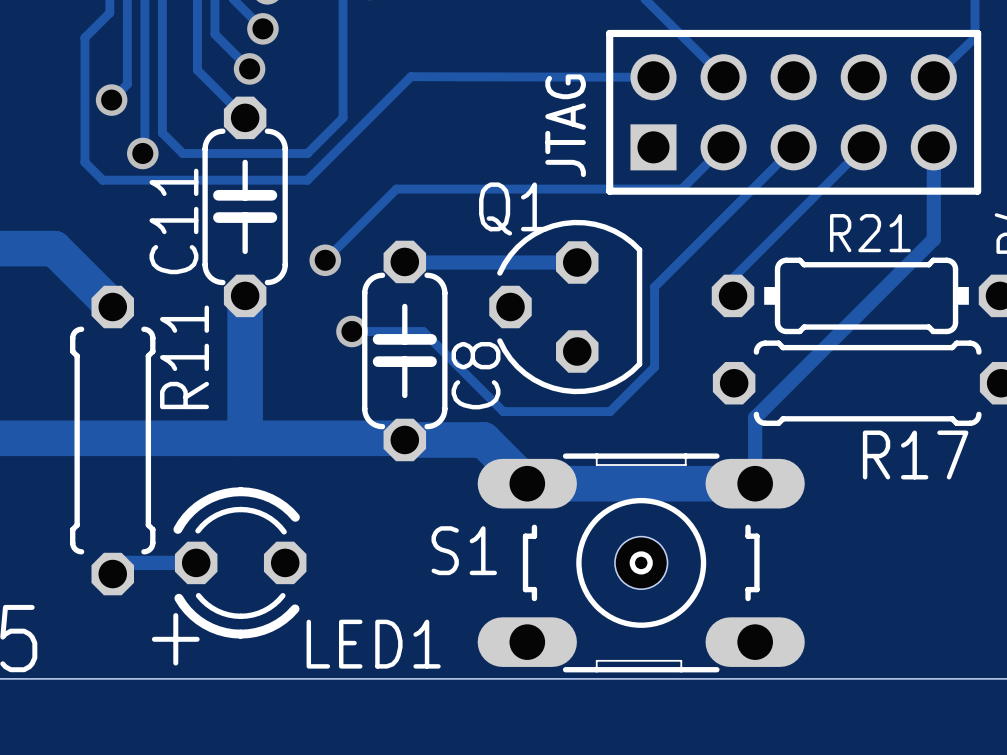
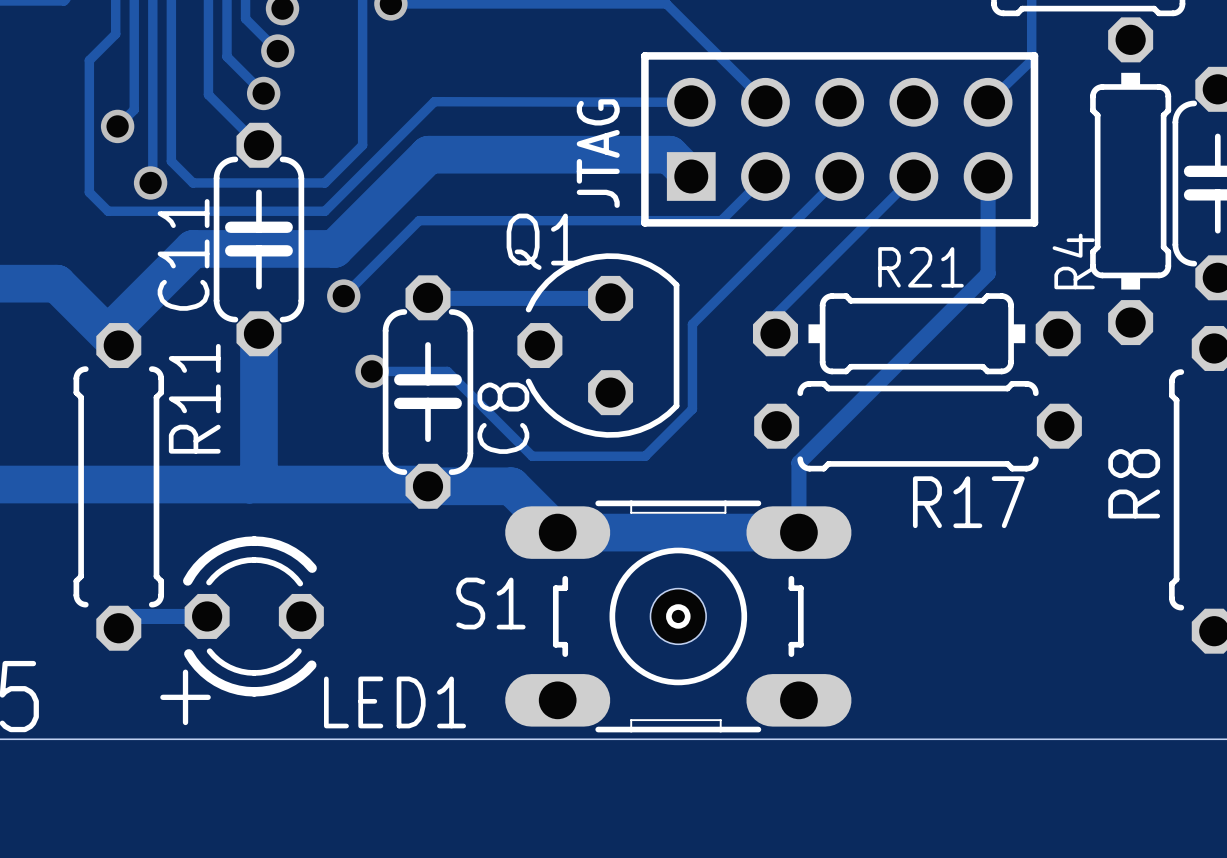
track: none -> (691, 176) (669, 154) (428, 154) (334, 248) (193, 248) (118, 323) (118, 345)

